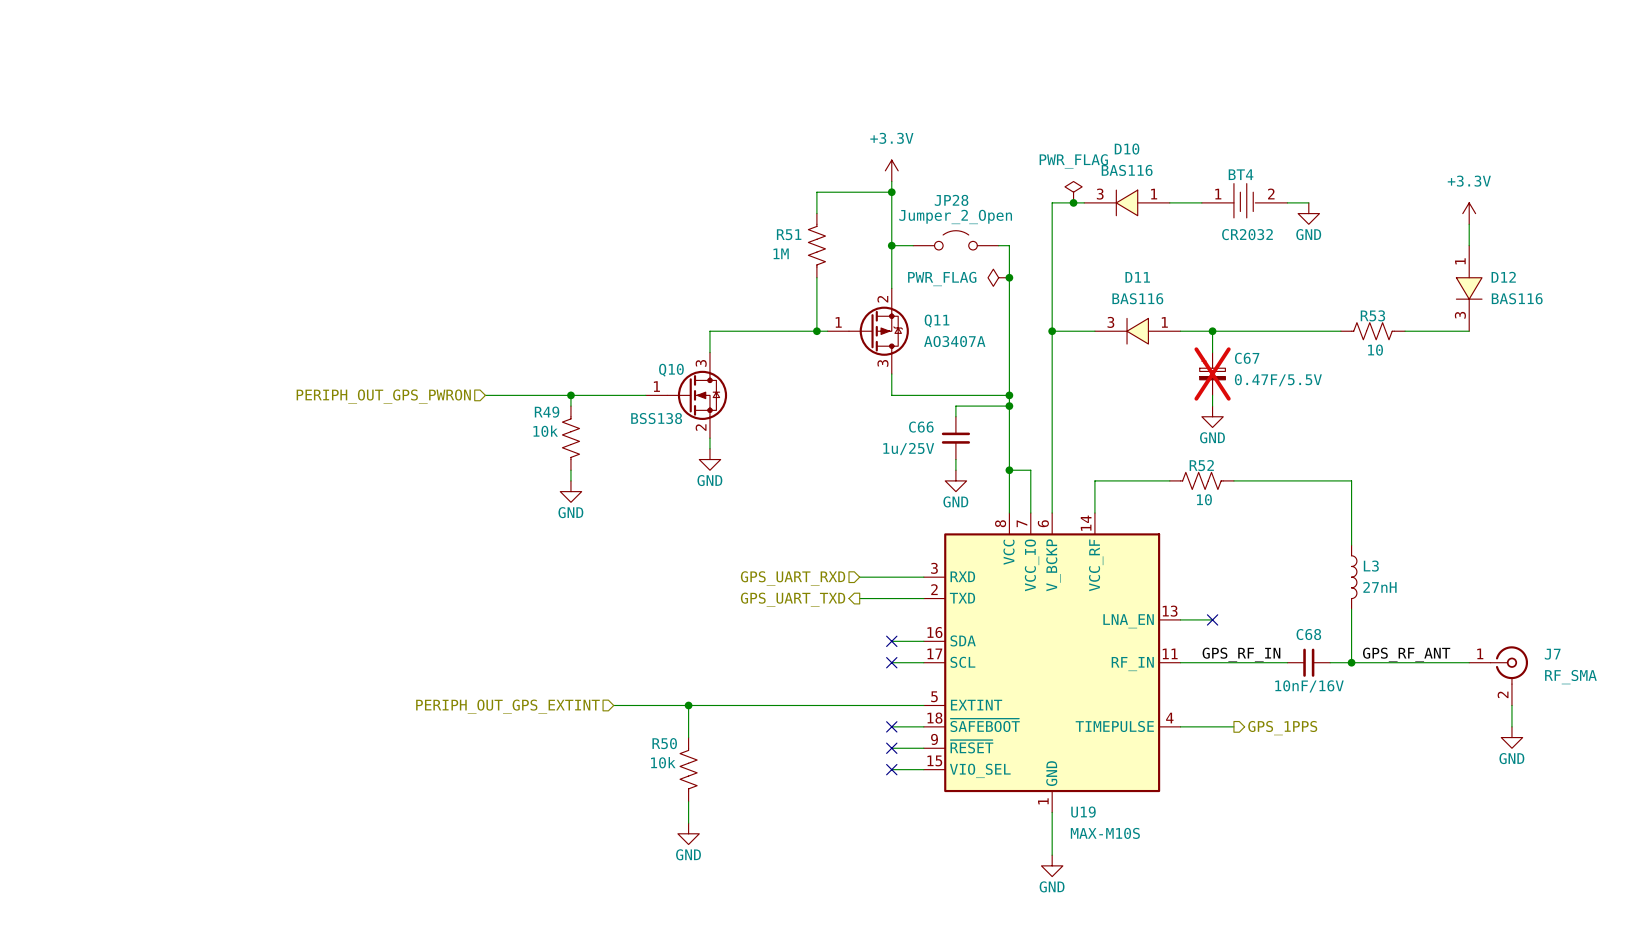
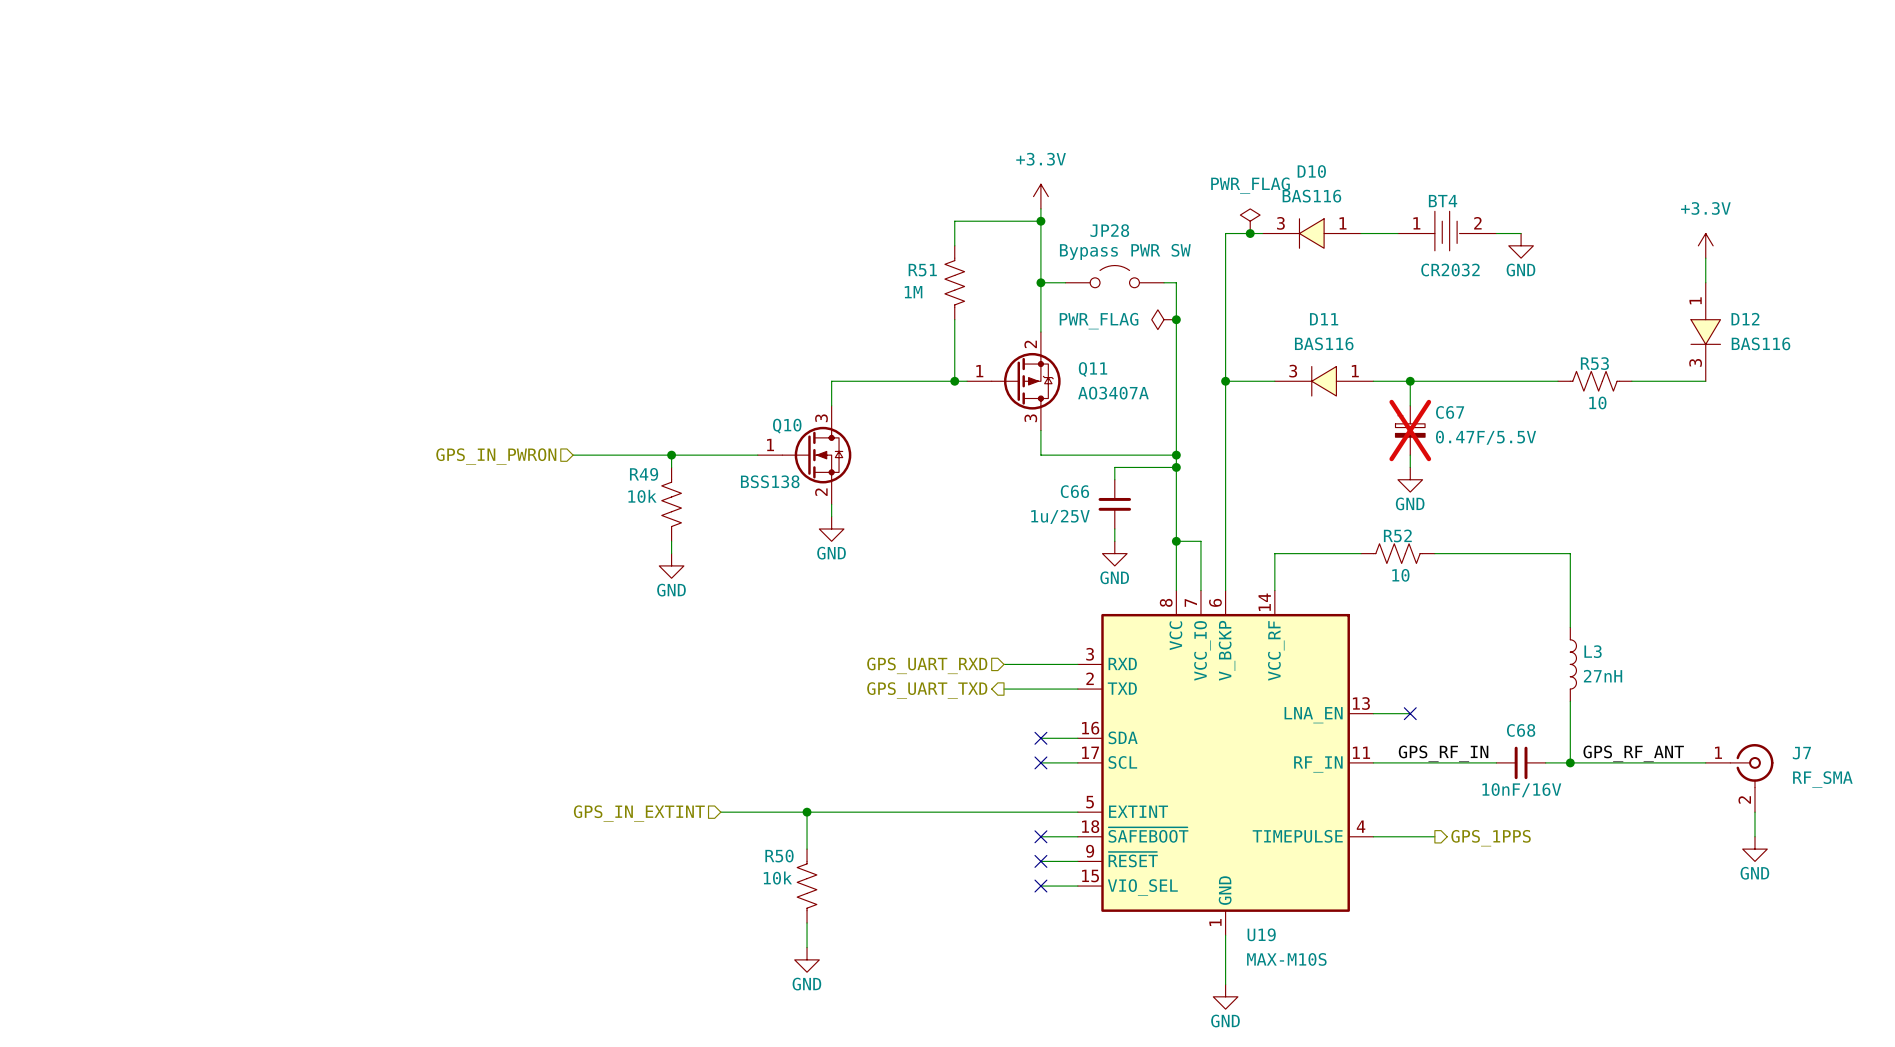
JP28 value: Jumper_2_Open (955, 216) -> Bypass PWR SW (1125, 251)
hierarchical label: PERIPH_OUT_GPS_PWRON (383, 396) -> GPS_IN_PWRON (496, 456)
hierarchical label: PERIPH_OUT_GPS_EXTINT (507, 706) -> GPS_IN_EXTINT (639, 813)

